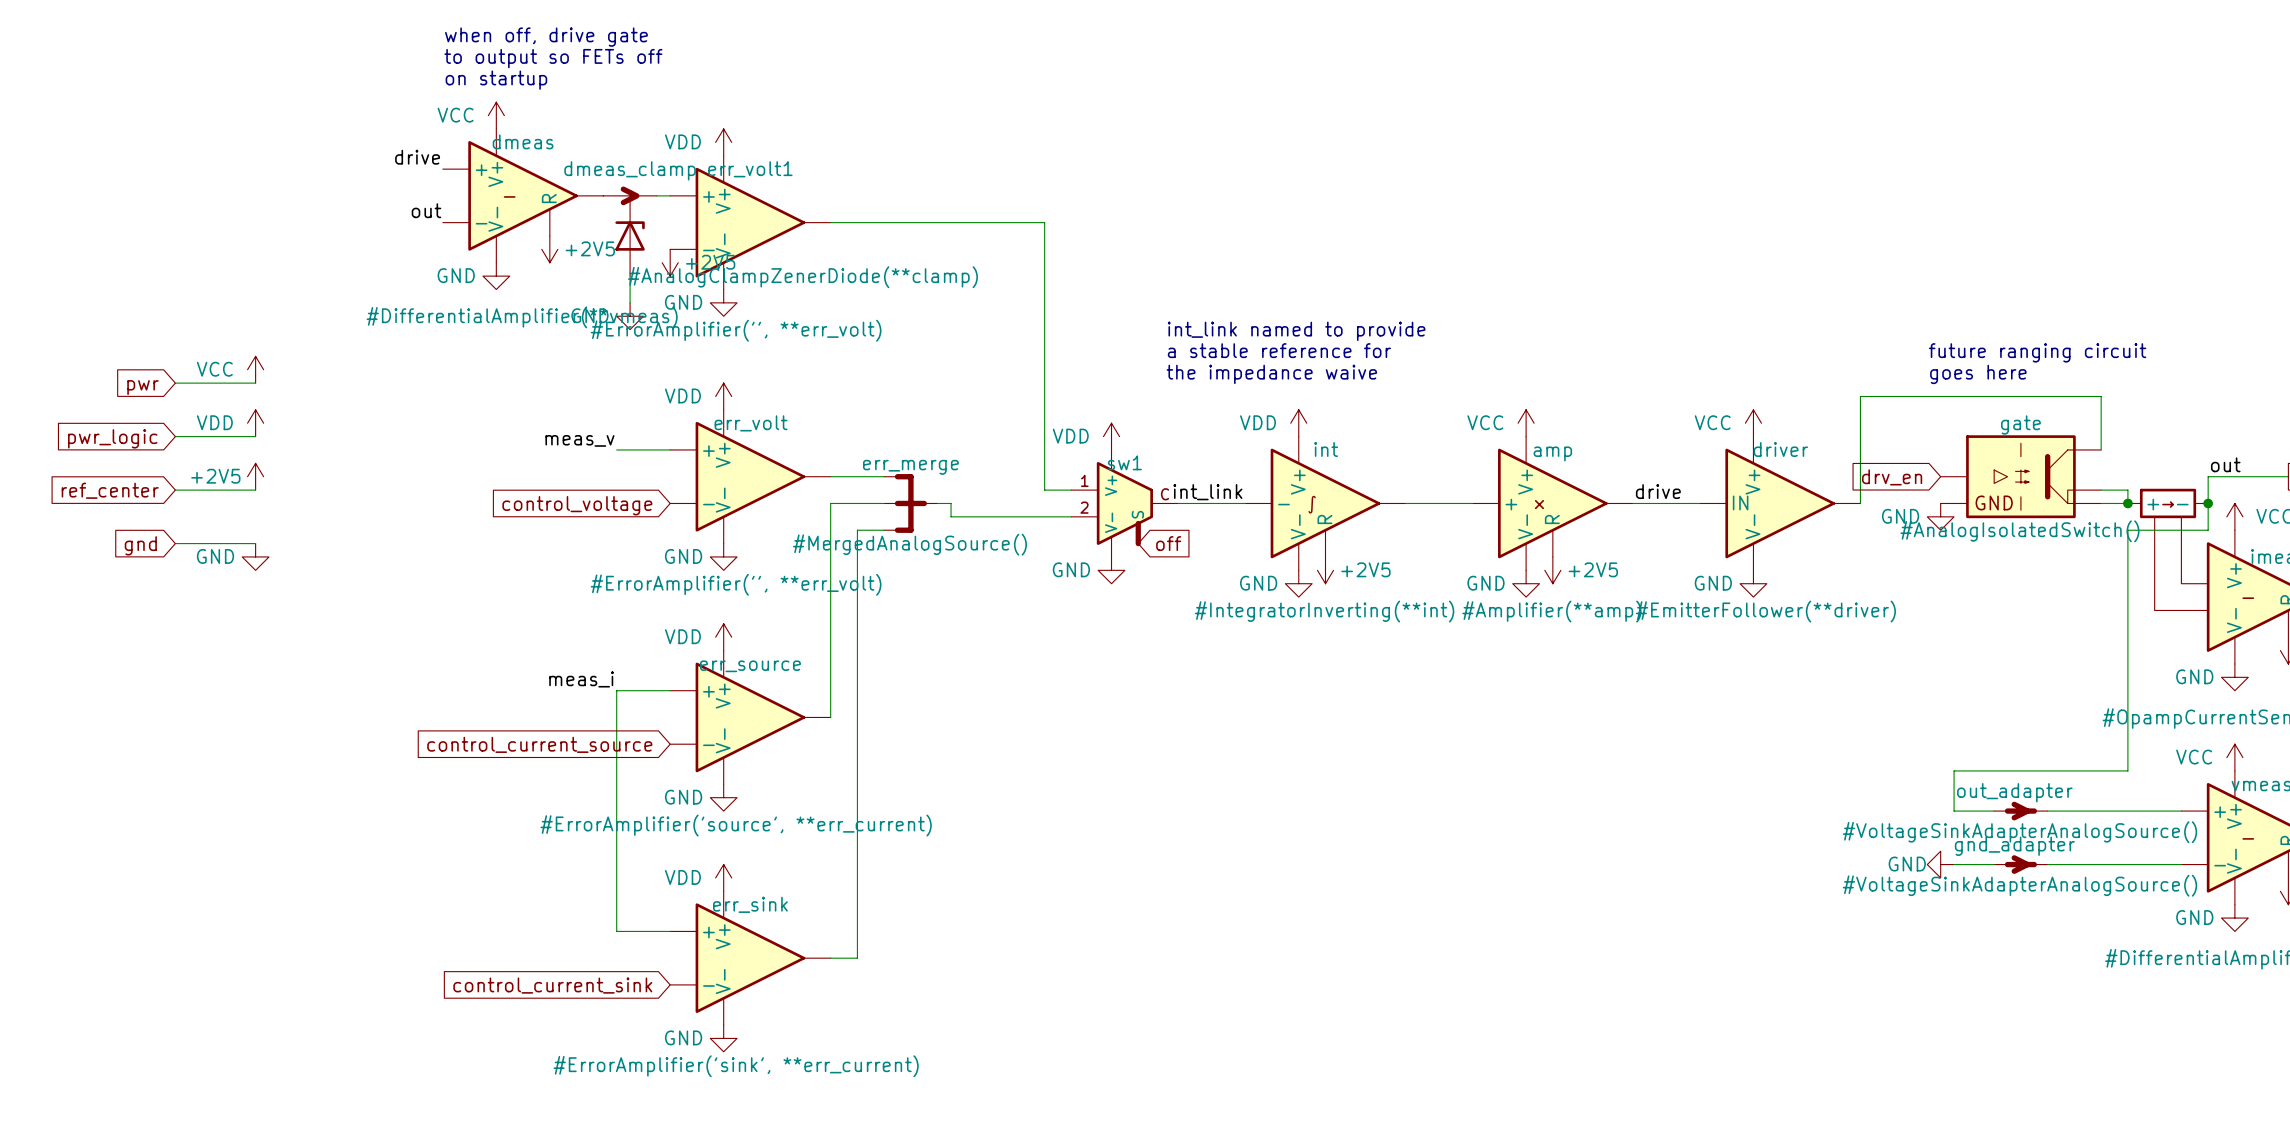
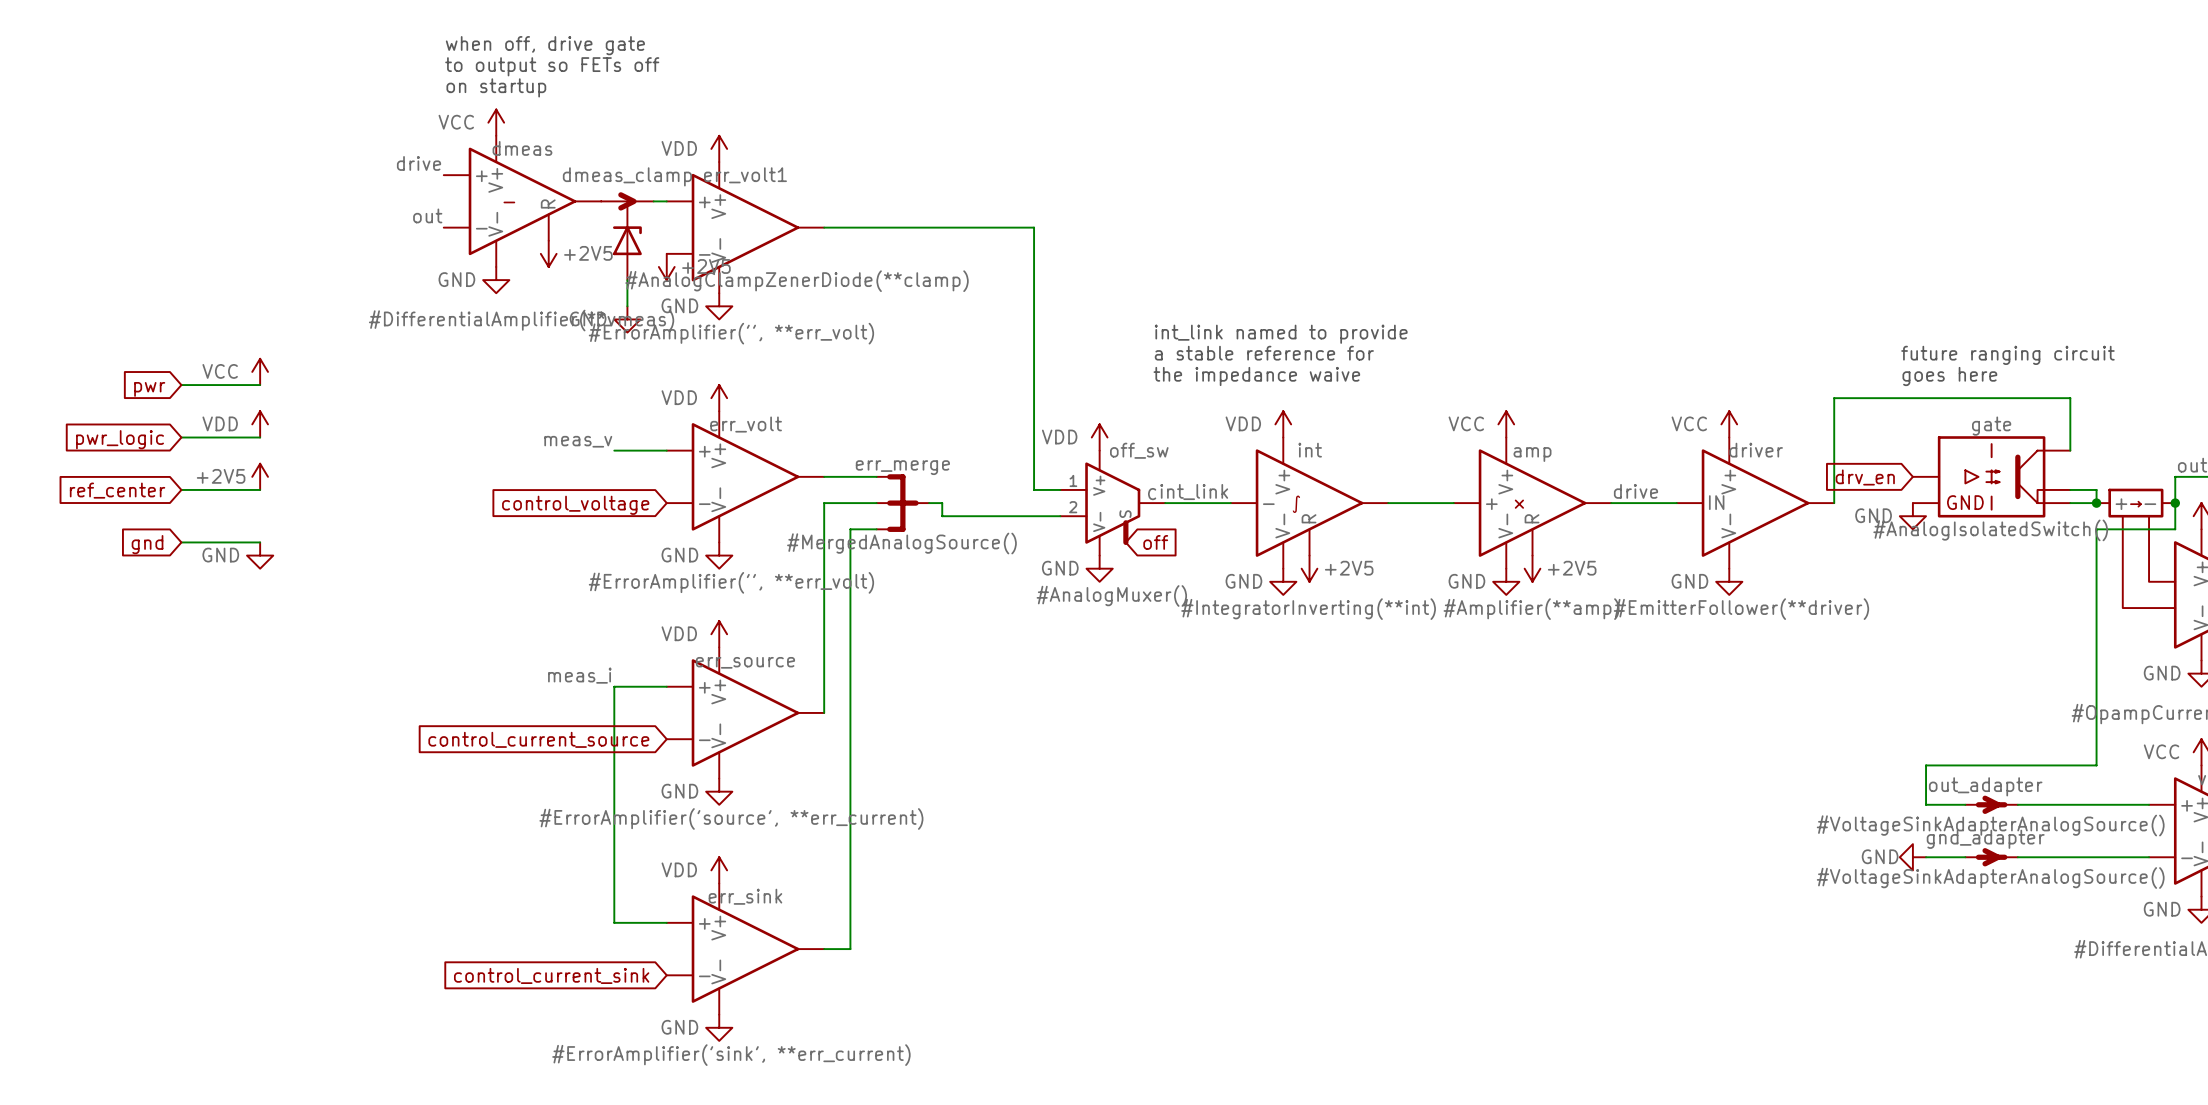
sw1 name: sw1 (1124, 462) -> off_sw (1139, 450)
sw1 value: none -> #AnalogMuxer() (1111, 595)

